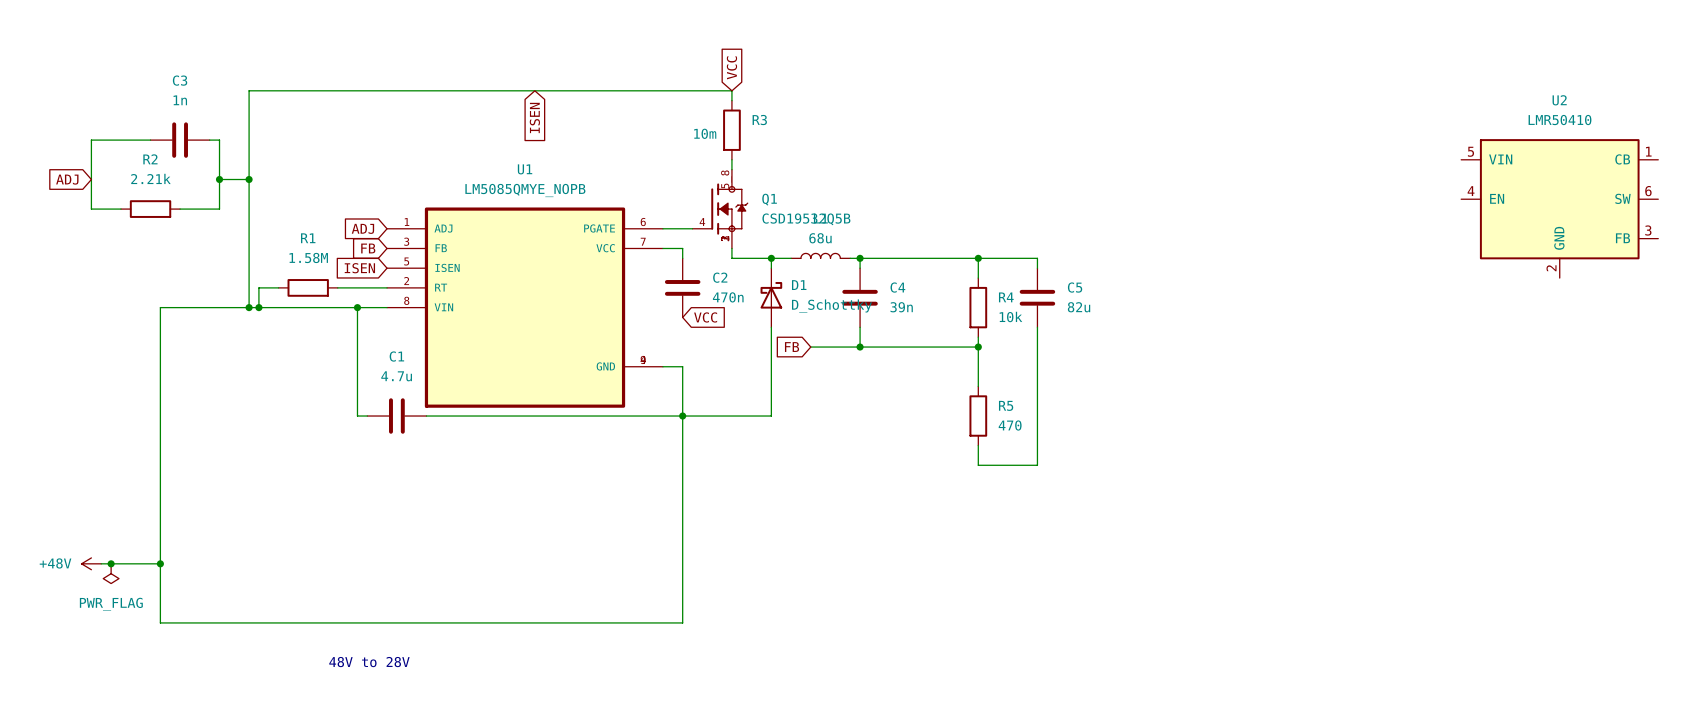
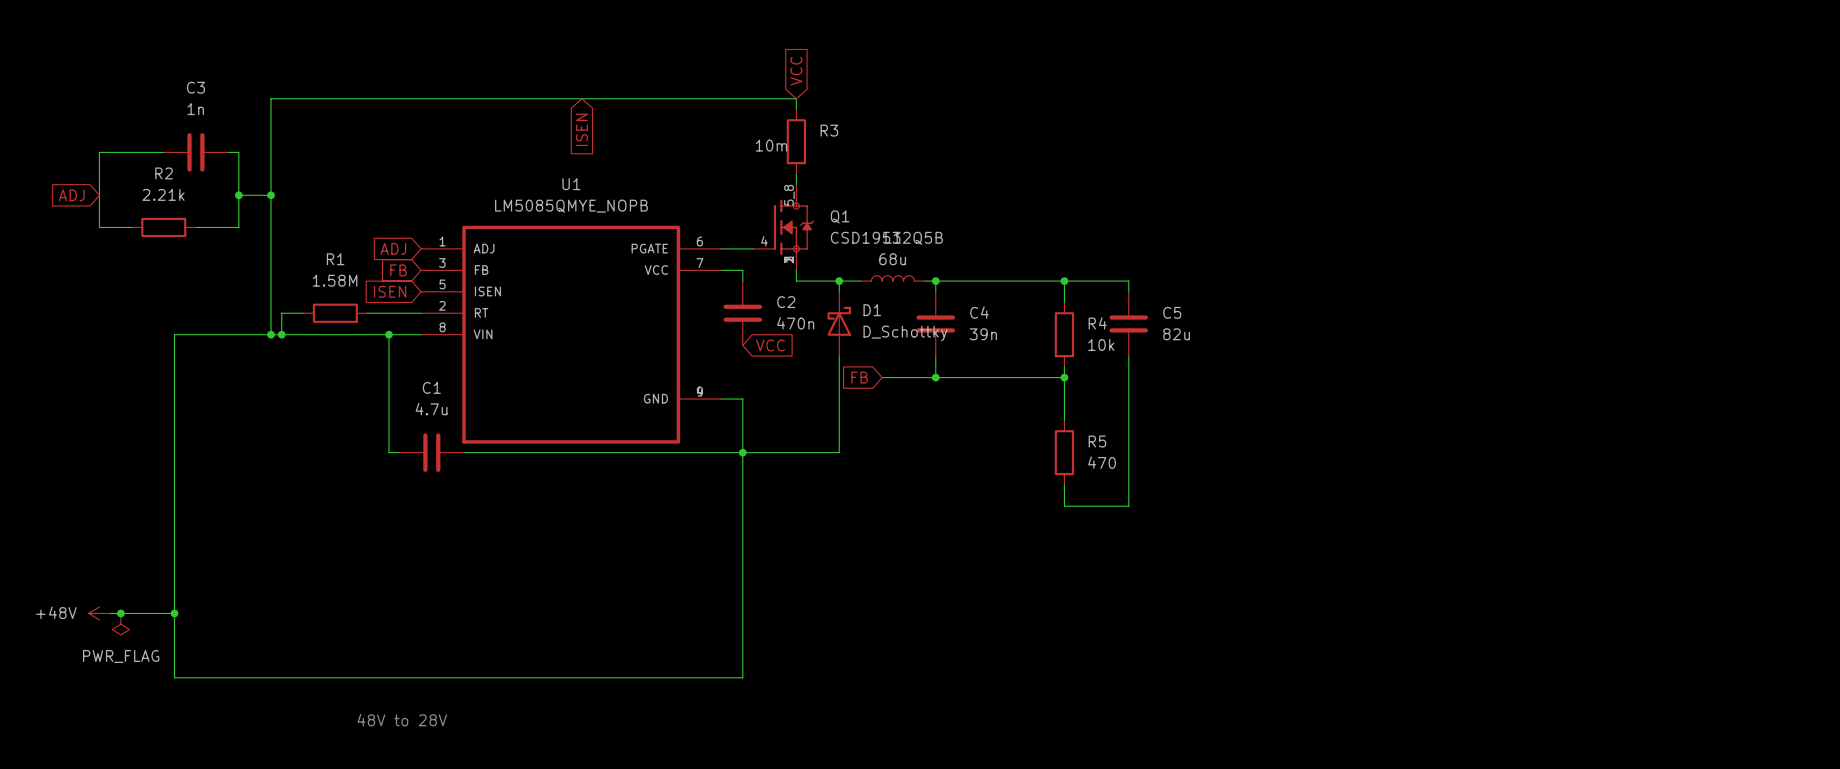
U2: LMR50410 (1559, 208) -> none

